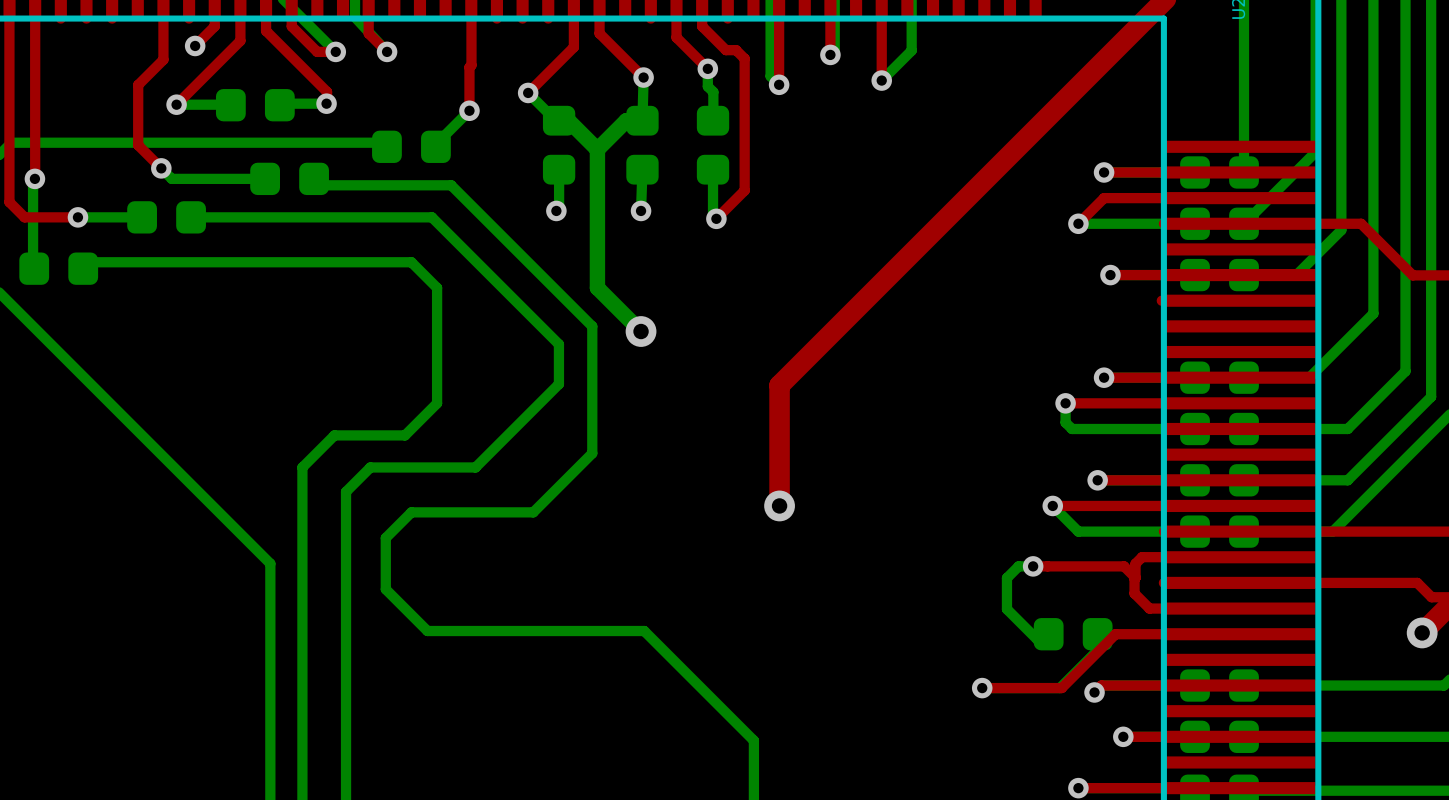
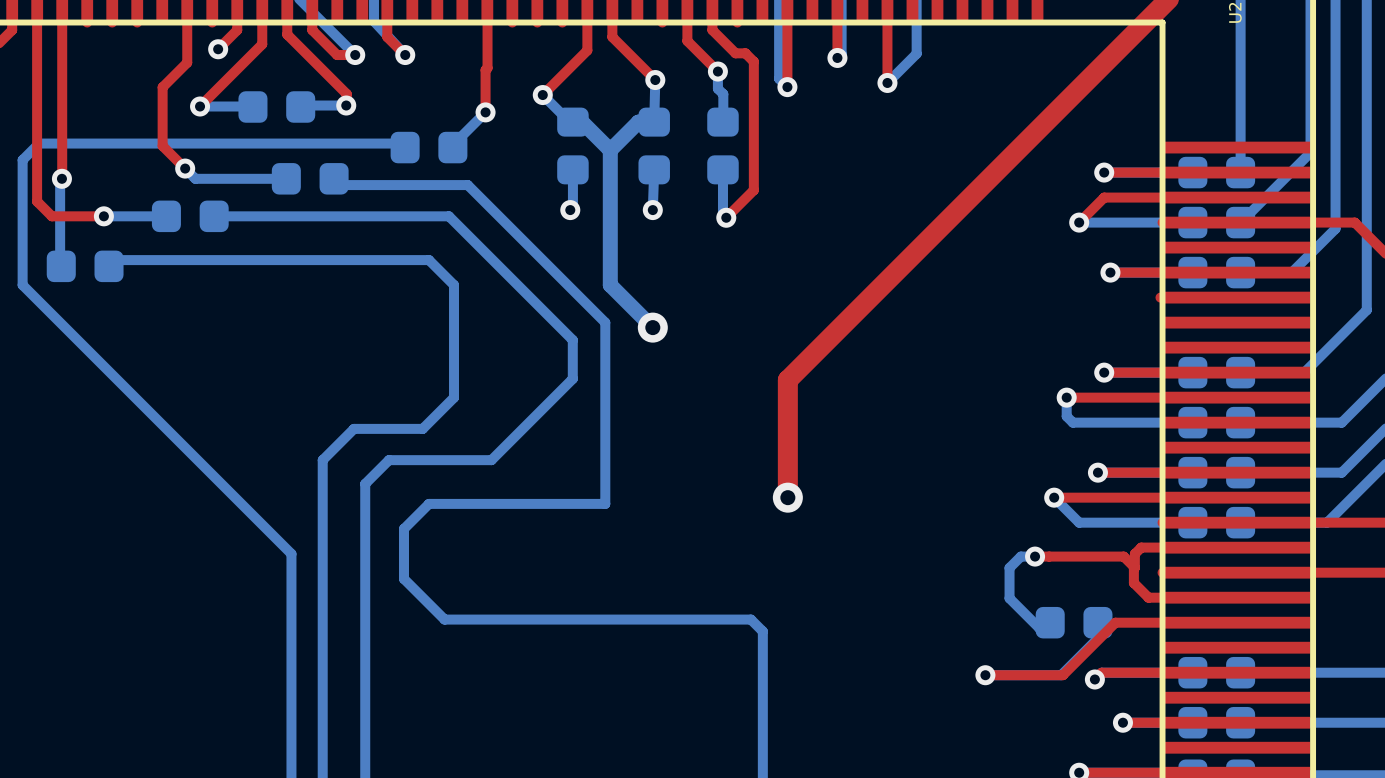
bottom track: (592, 453) (533, 512) -> (605, 446) (605, 503) (547, 503)
bottom track: (644, 631) (753, 740) -> (655, 619) (750, 619) (762, 631) (762, 726)

